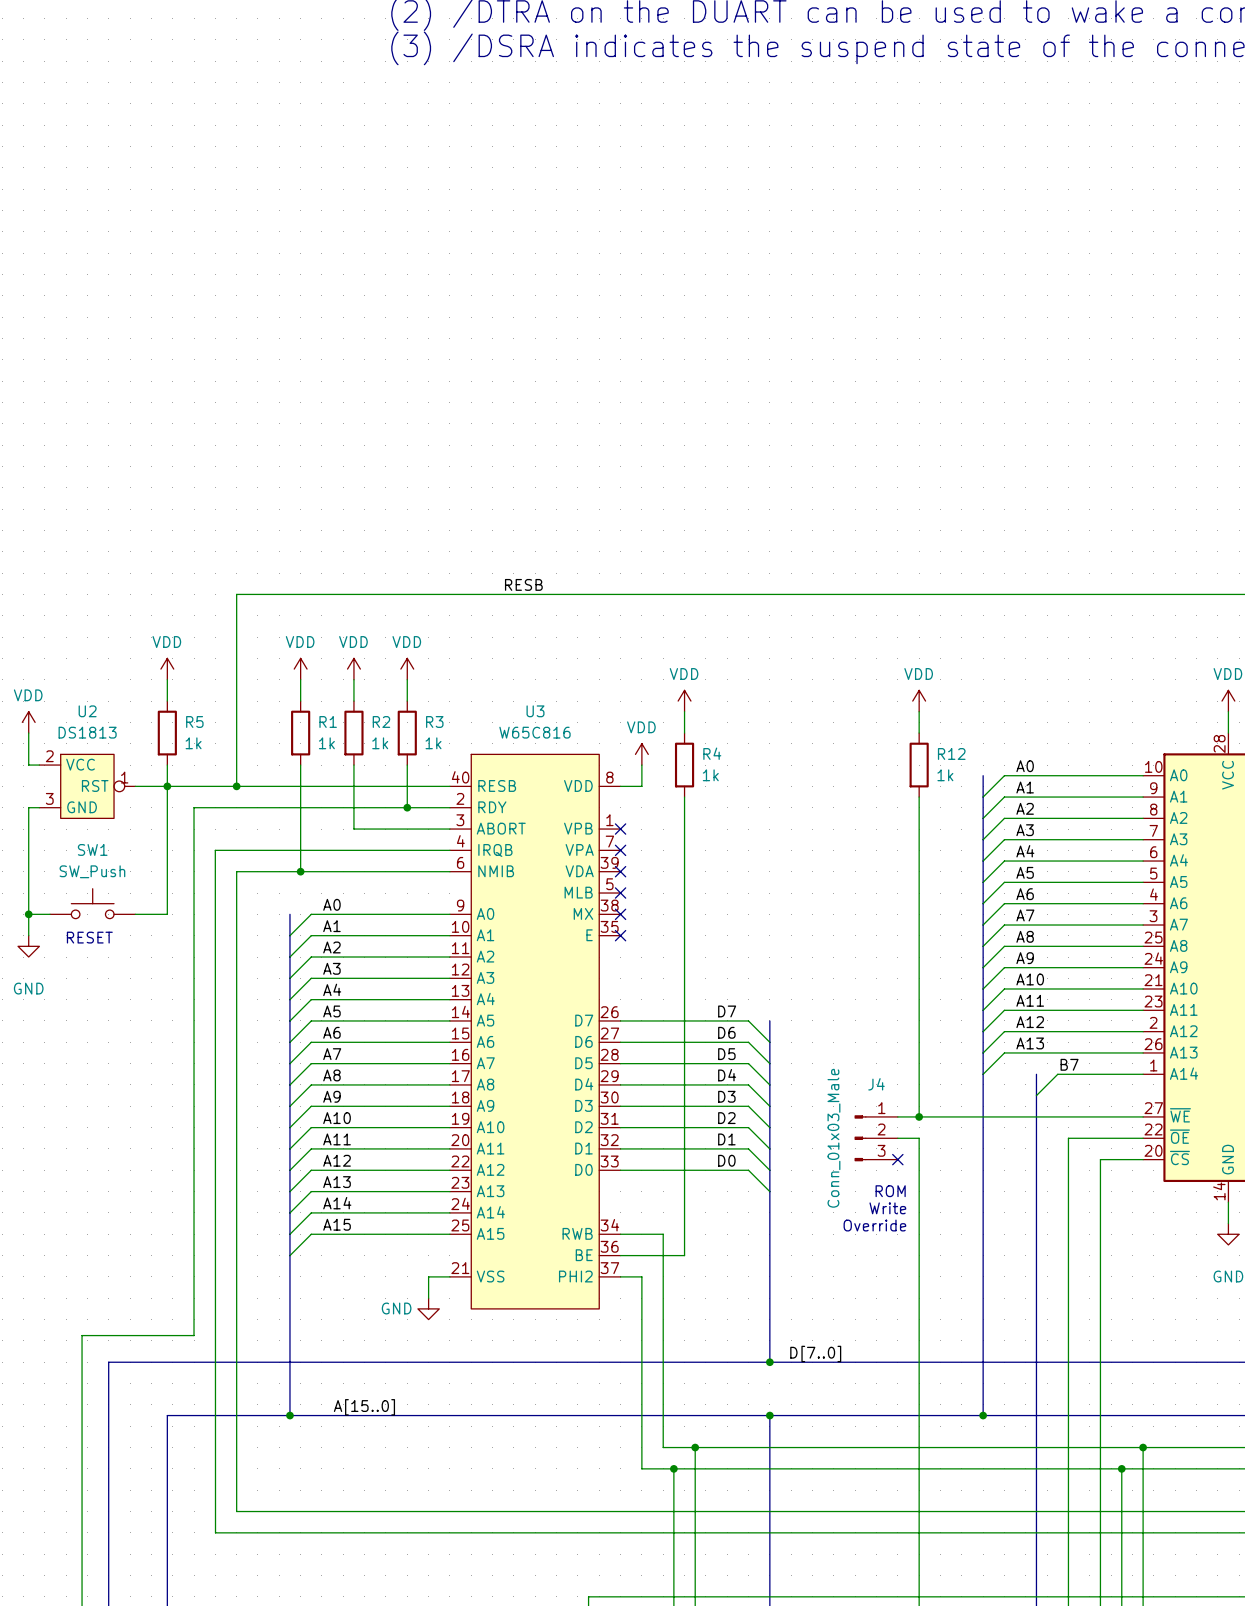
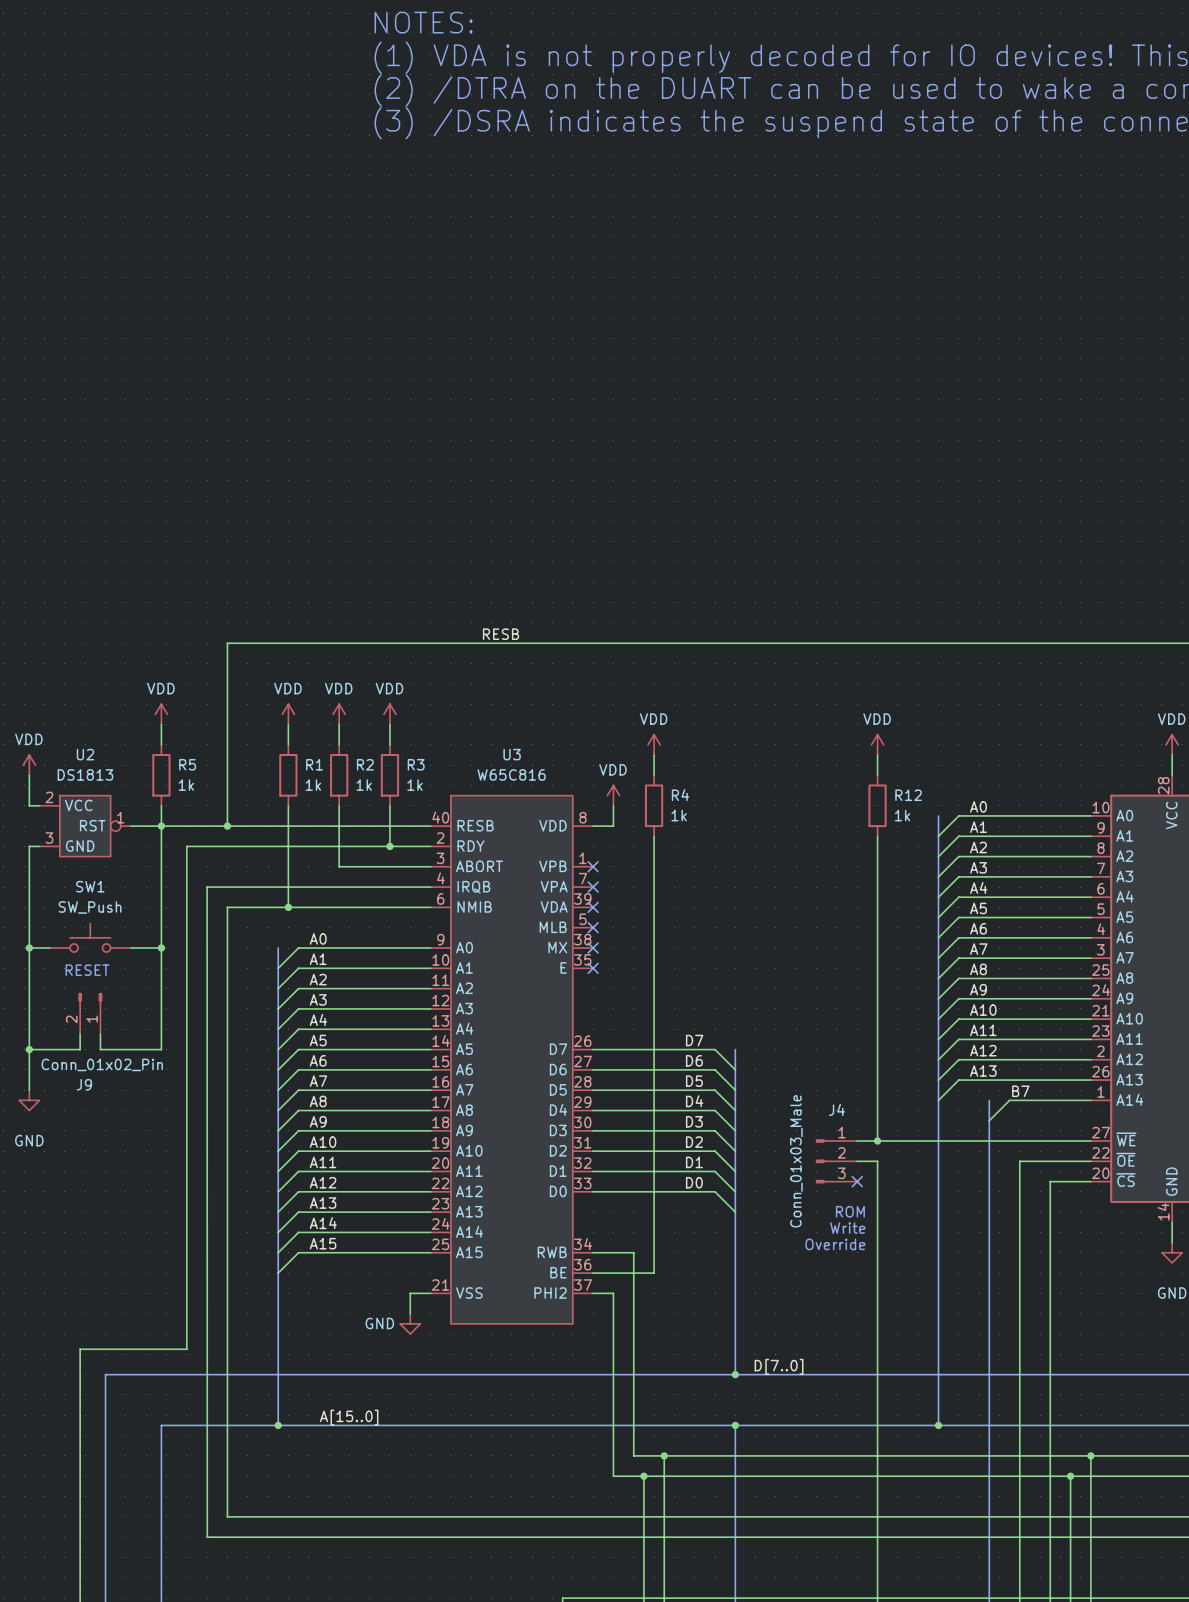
wire: none -> (161, 948) (161, 1049) (100, 1049) (100, 1034)
junction: none -> (161, 948)
wire: none -> (29, 968) (29, 1090)
power symbol position: GND (28, 946) -> GND (29, 1100)
J9: none -> Conn_01x02_Pin (90, 1013)
wire: none -> (80, 1034) (80, 1049) (29, 1049)
junction: none -> (29, 1049)

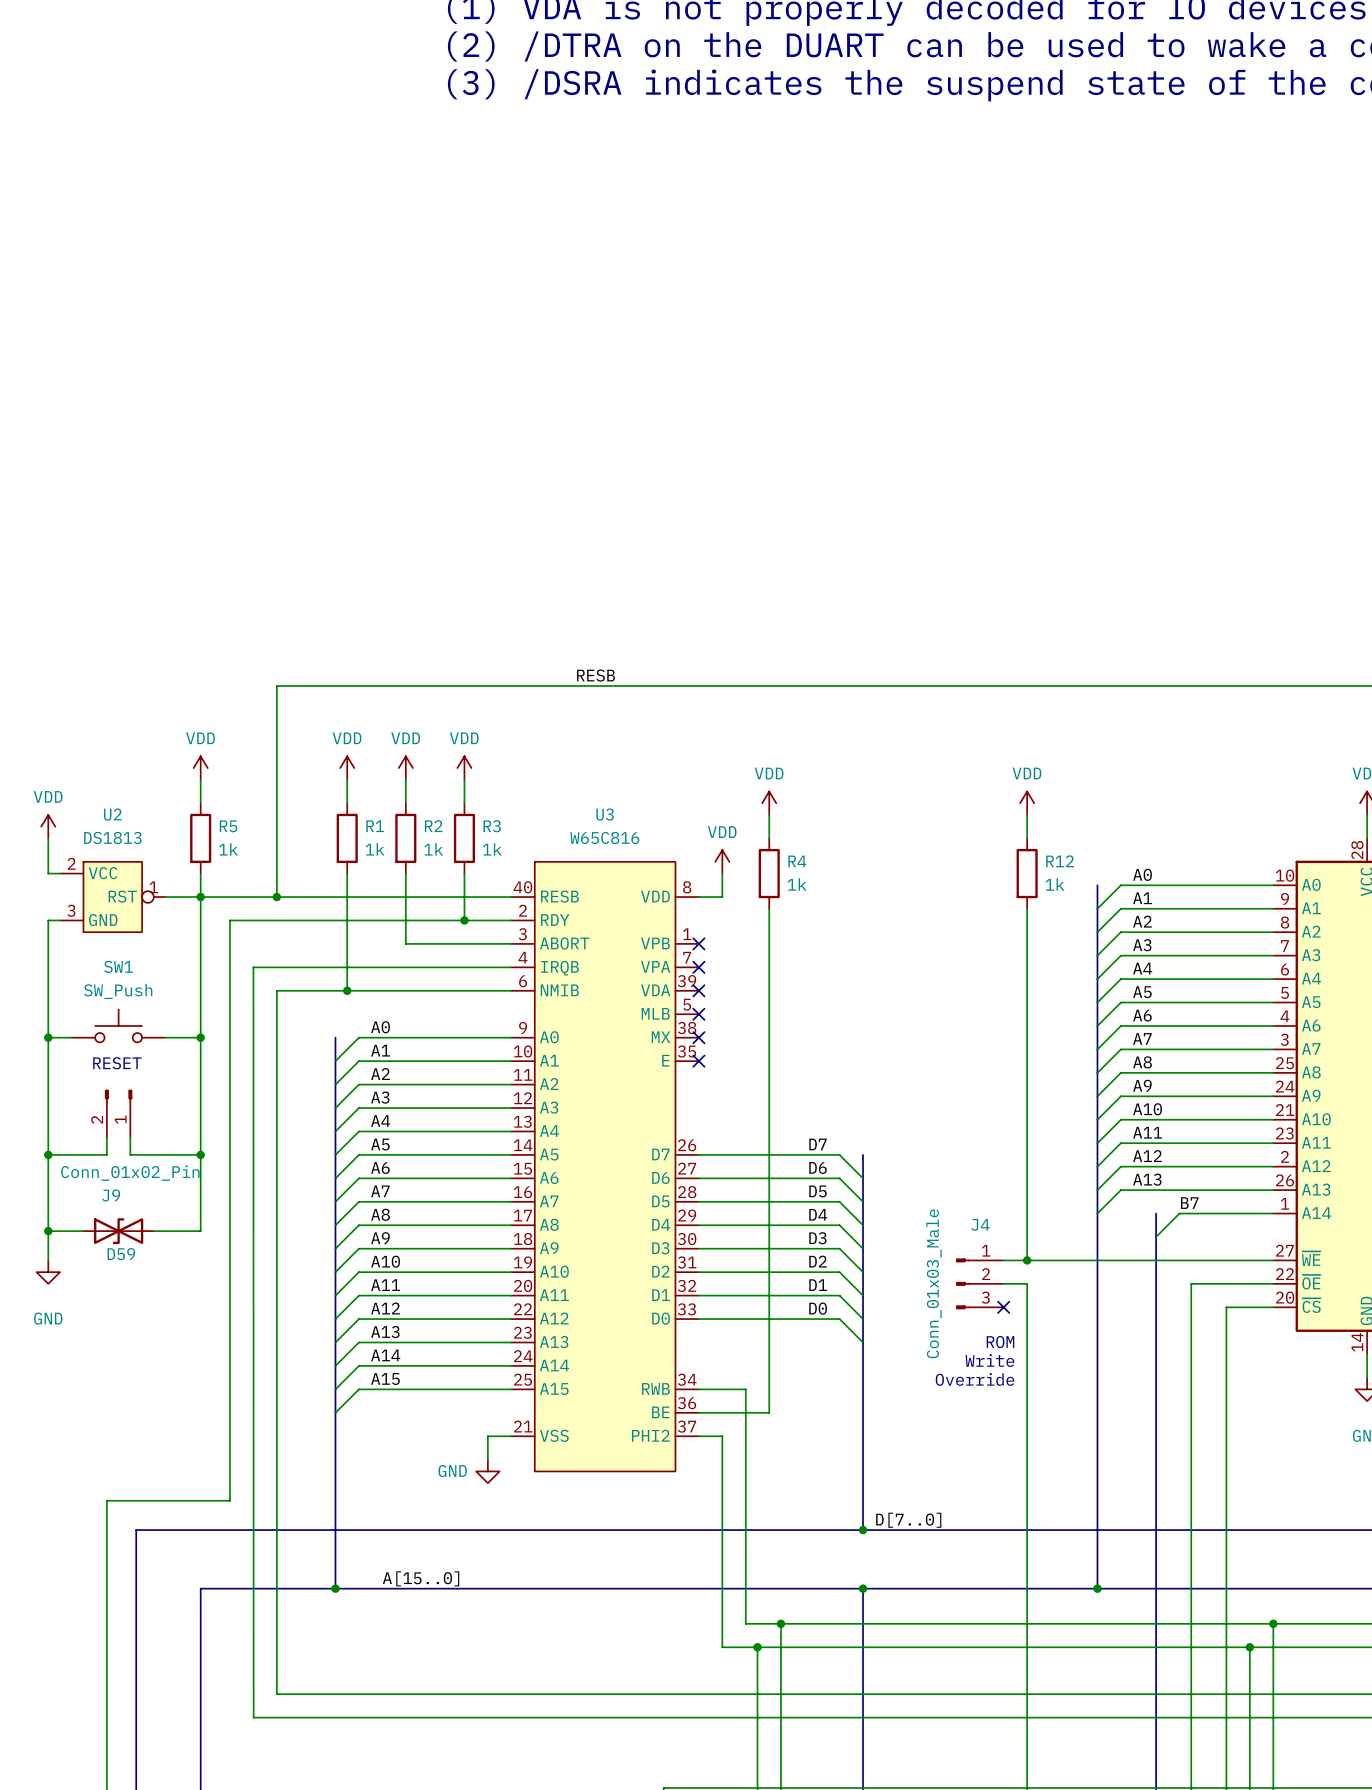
wire: none -> (200, 1154) (200, 1231) (153, 1231)
junction: none -> (200, 1154)
wire: none -> (48, 1201) (48, 1260)
power symbol position: GND (29, 1100) -> GND (48, 1272)
wire: none -> (48, 1231) (83, 1231)
junction: none -> (48, 1231)
D59: none -> (118, 1231)

